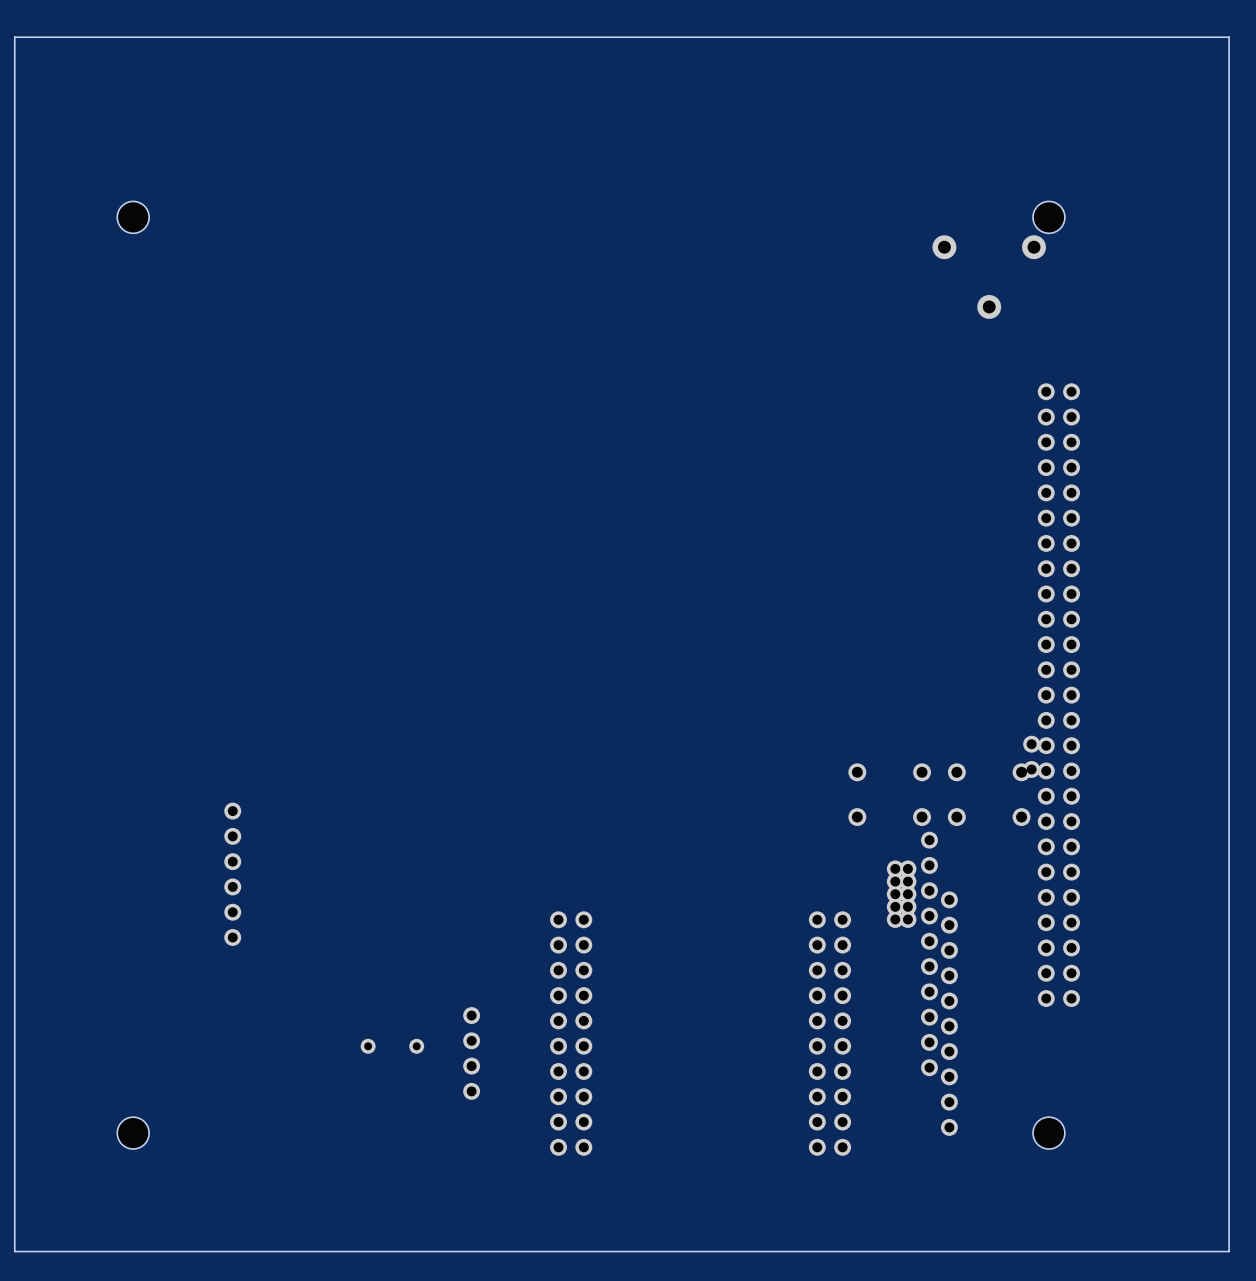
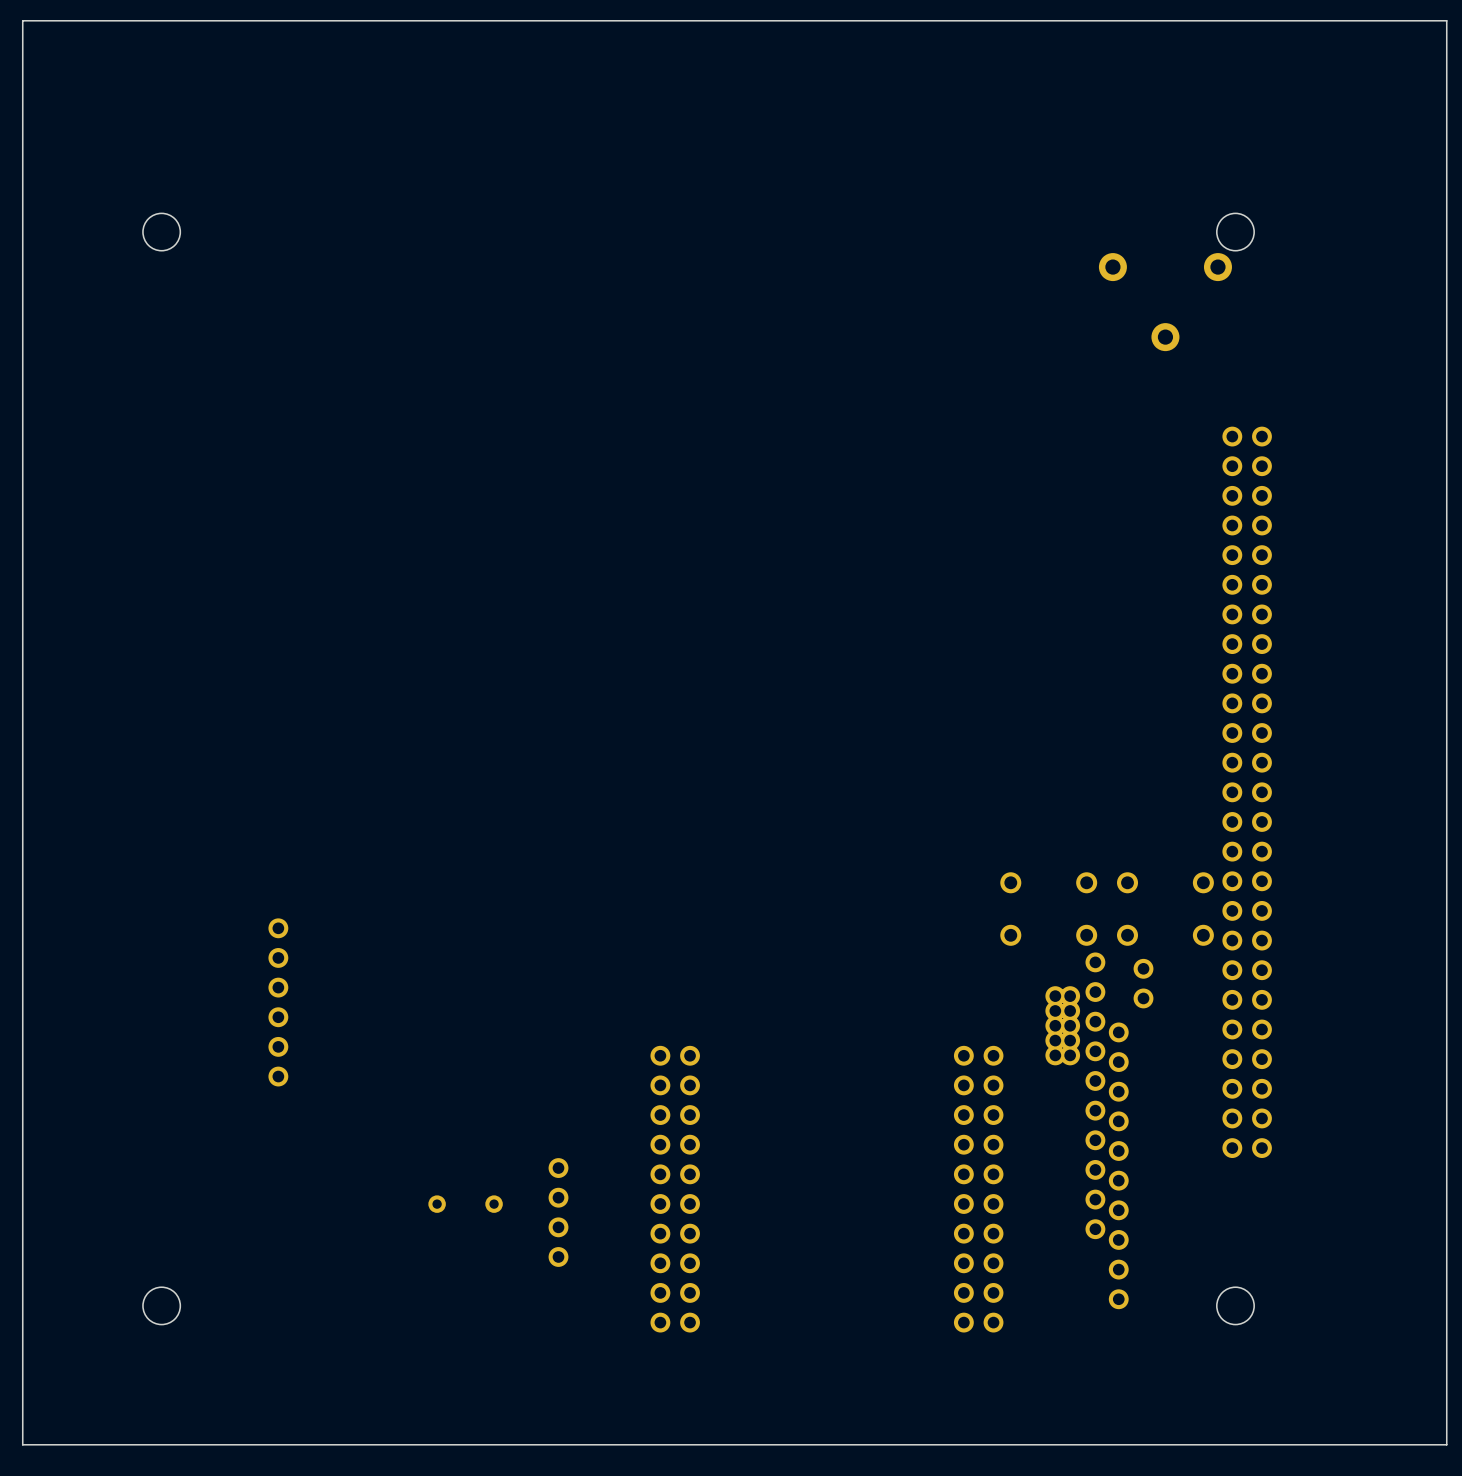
part position: (1031, 756) -> (1143, 983)

